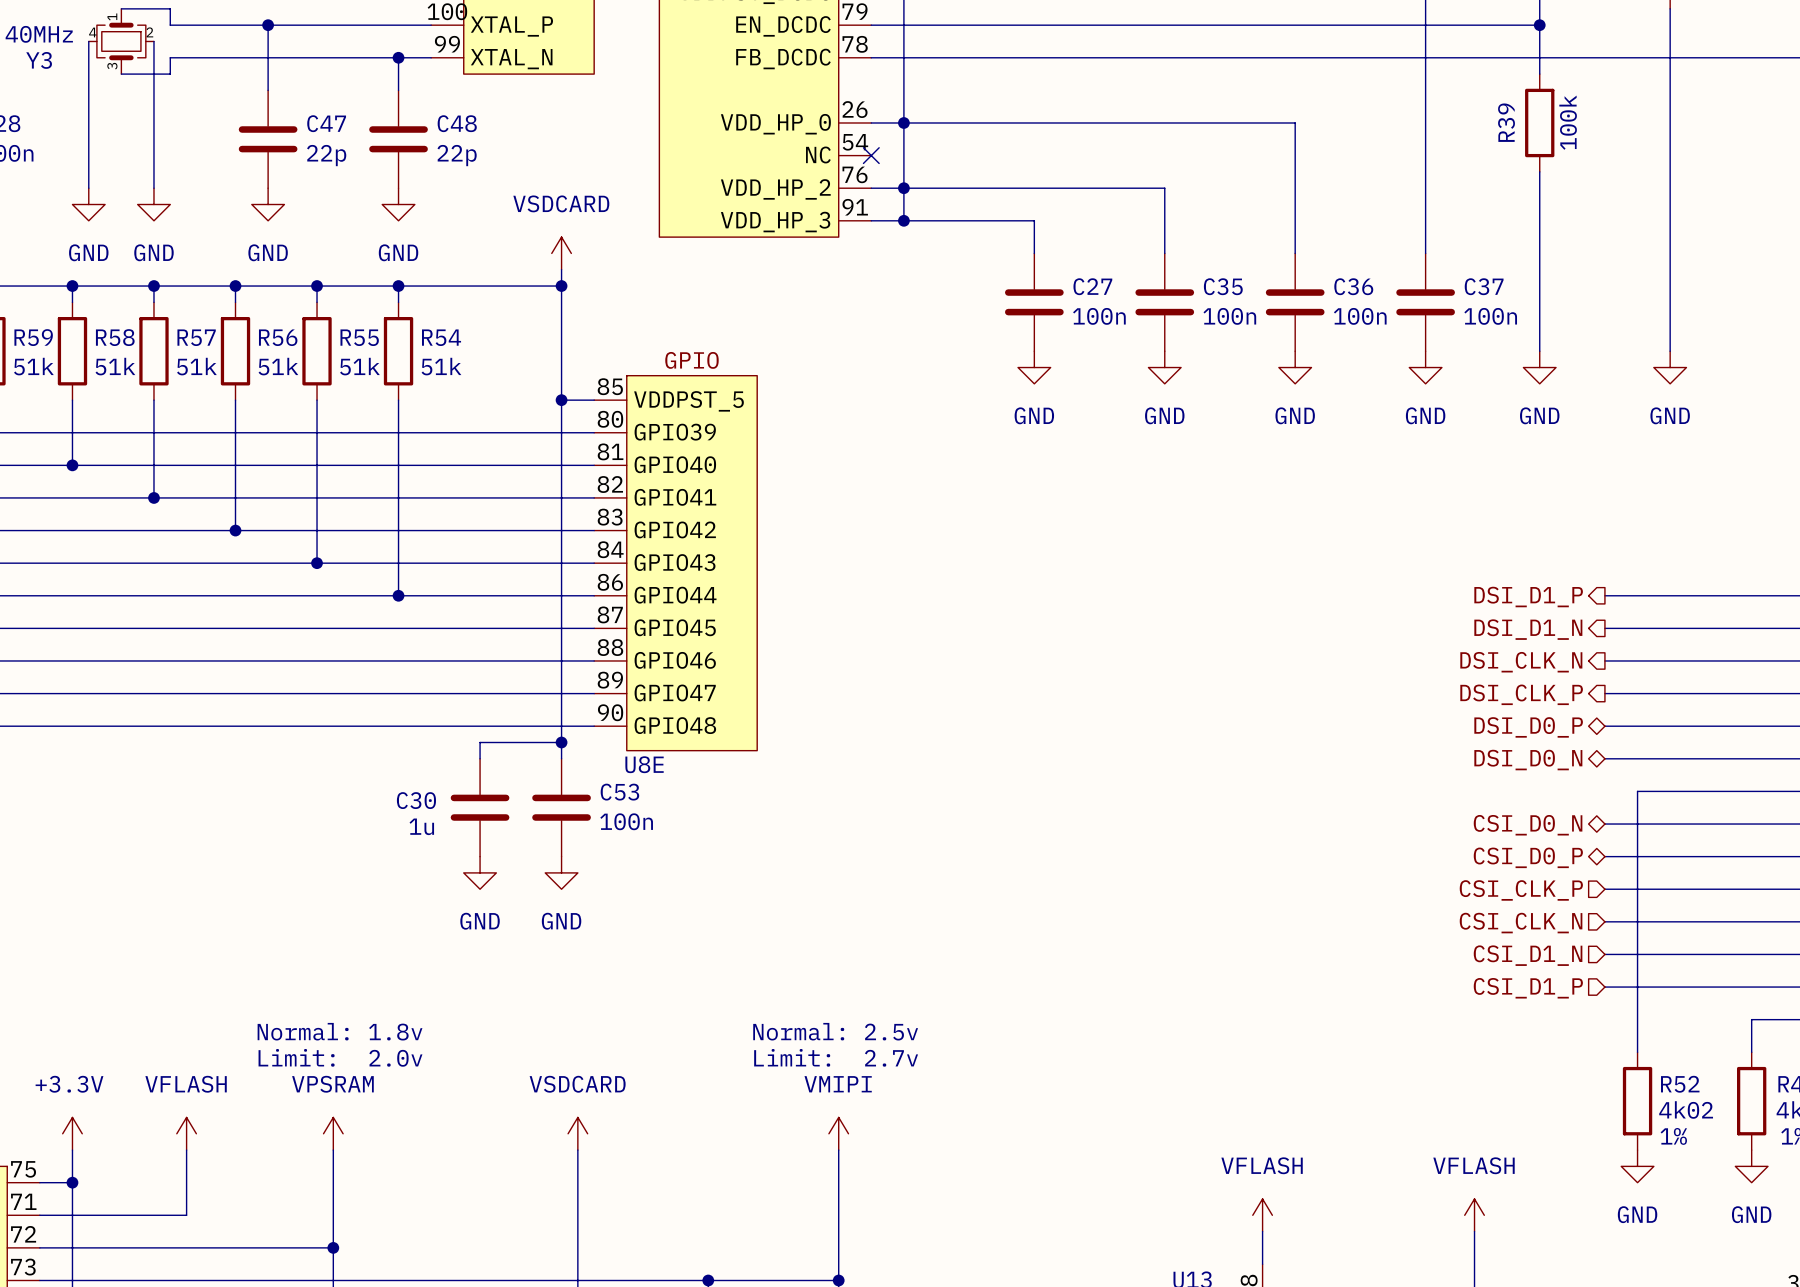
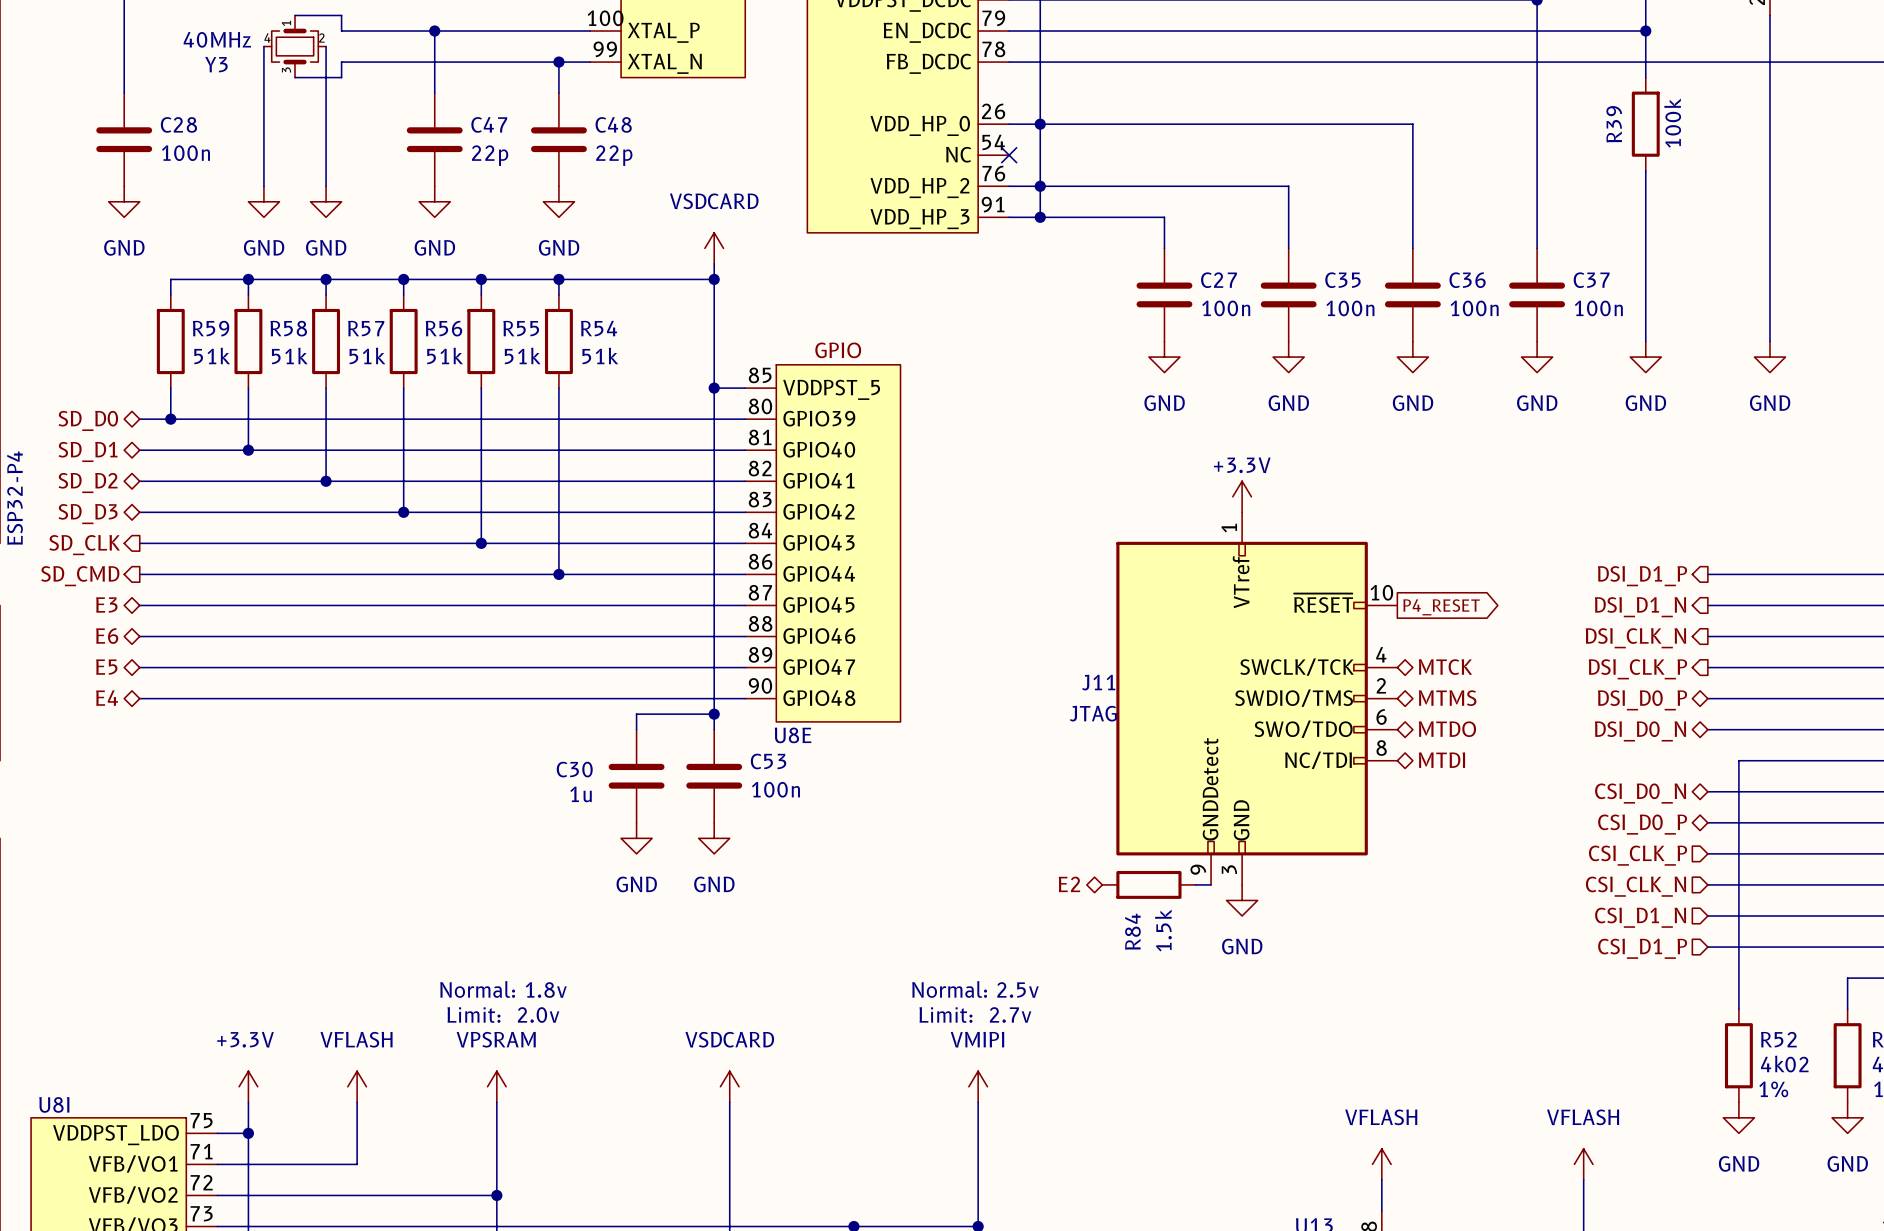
power symbol: none -> +3.3V (1242, 496)
global label: none -> P4_RESET (1441, 607)
hierarchical label: none -> MTCK (1445, 667)
hierarchical label: none -> MTMS (1447, 698)
J11: none -> JTAG (1256, 698)
hierarchical label: none -> MTDO (1447, 729)
hierarchical label: none -> MTDI (1441, 760)
hierarchical label: none -> E2 (1069, 884)
R84: none -> 1.5k (1148, 884)
wire: none -> (1195, 884) (1211, 884)
power symbol: none -> GND (1242, 900)

